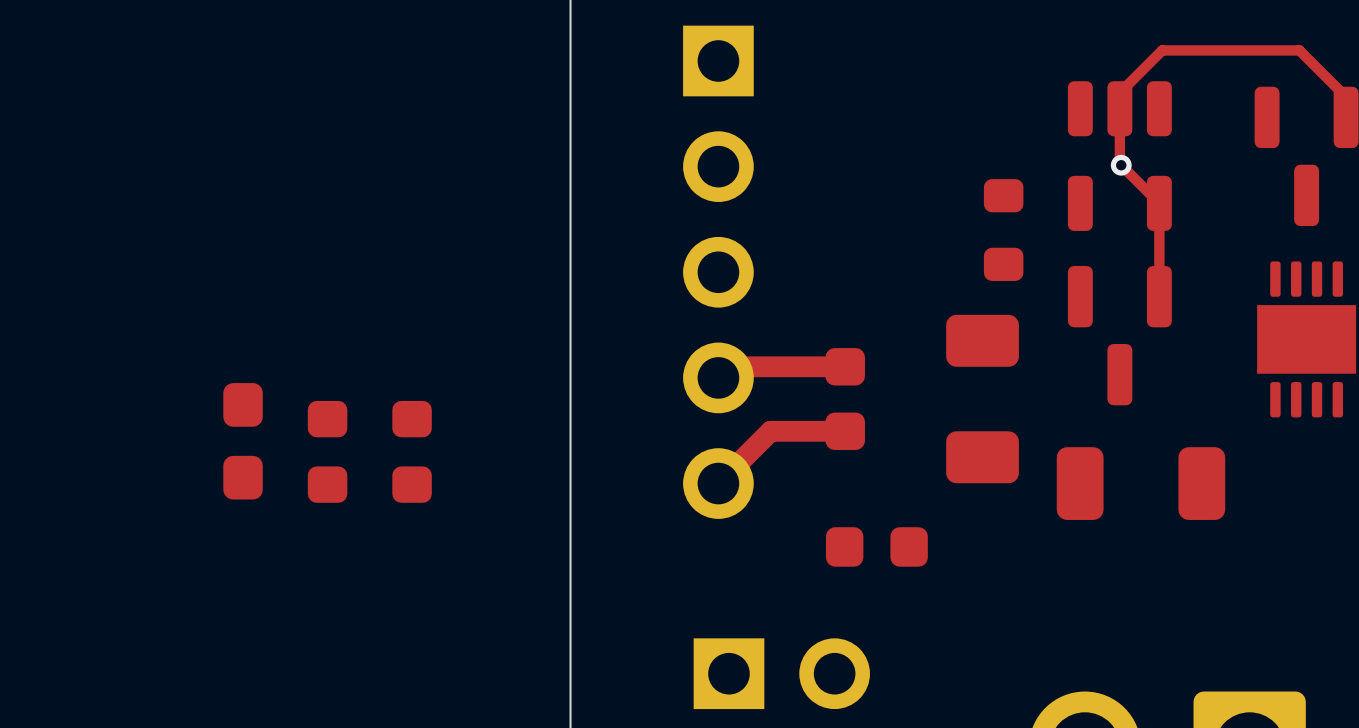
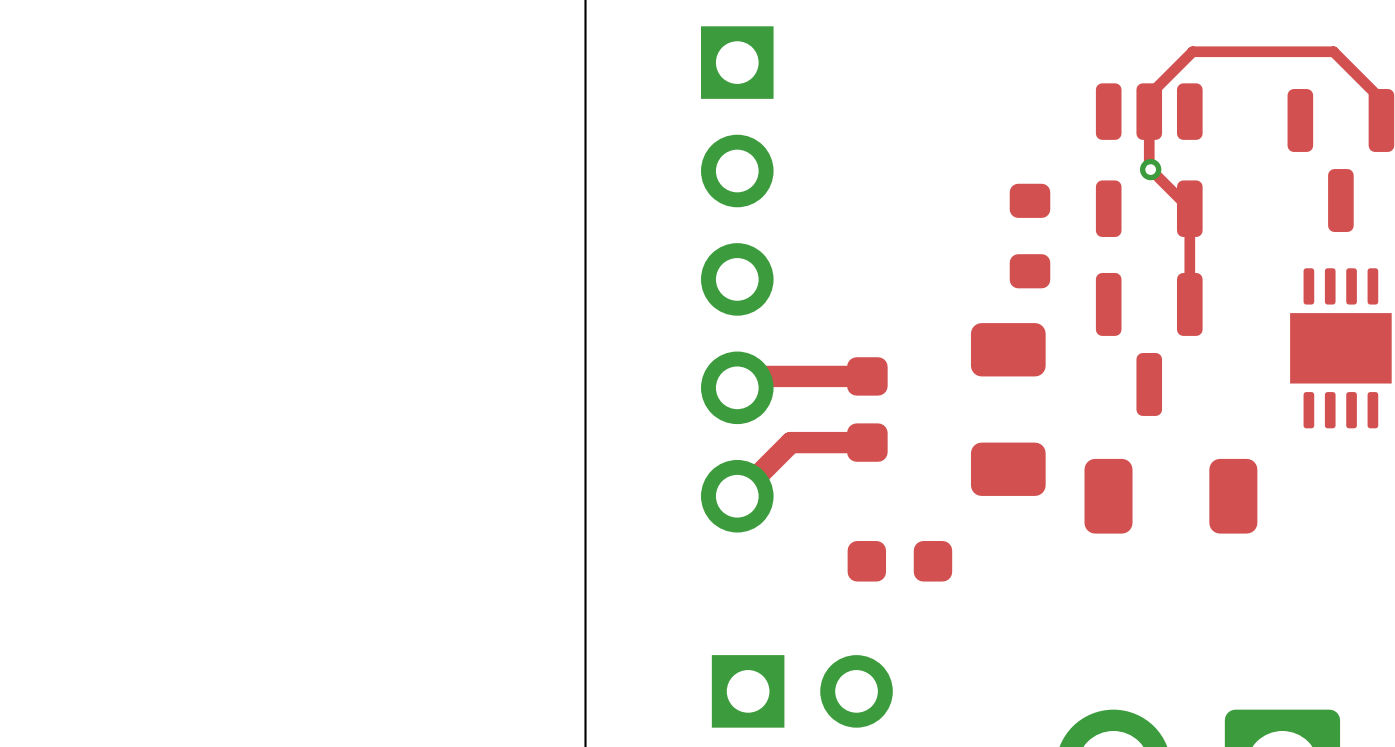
part: (243, 441) -> none
part: (327, 451) -> none
part: (412, 451) -> none

